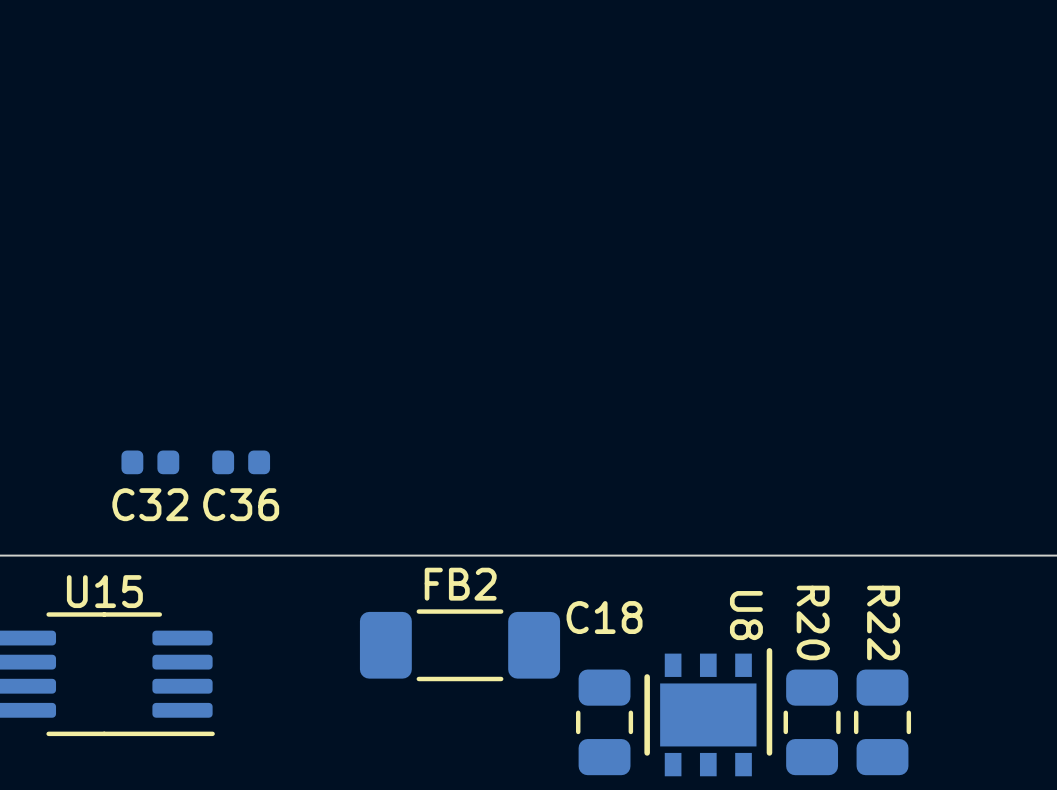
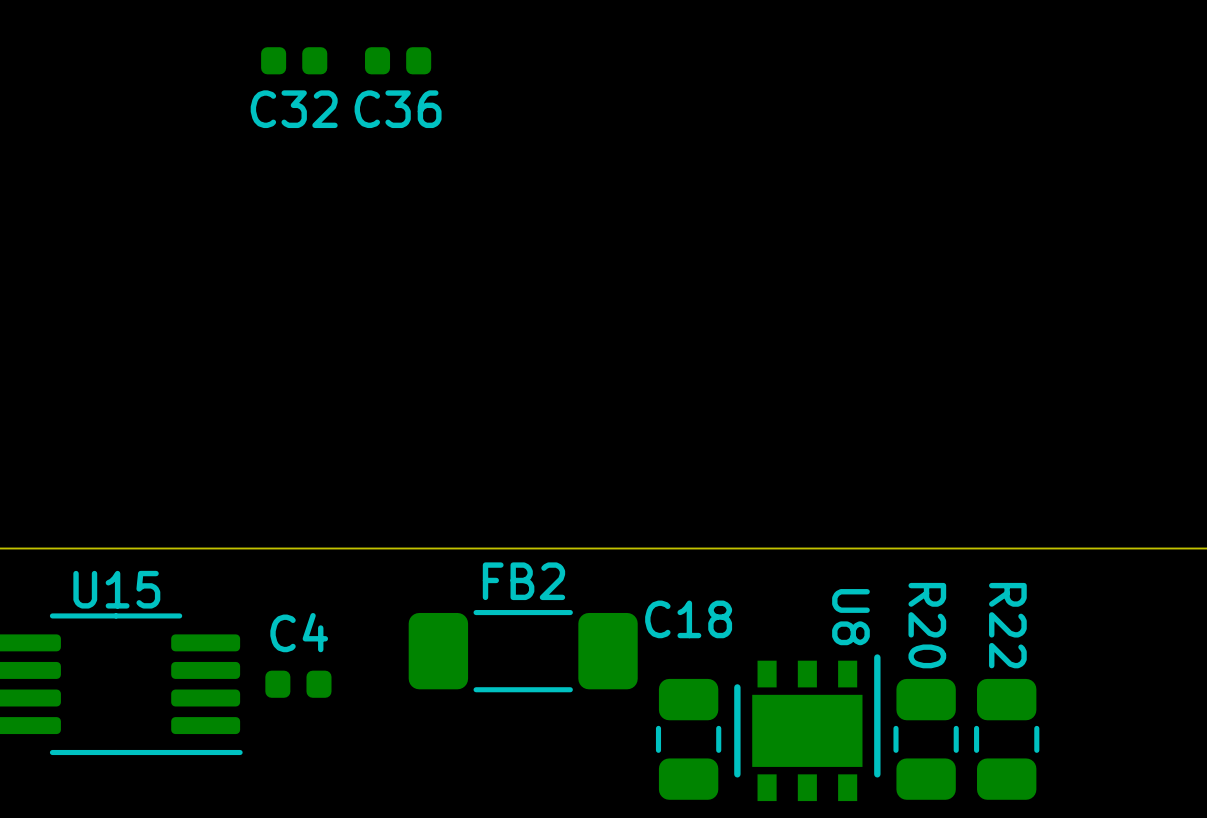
C32 position: (150, 462) -> (294, 60)
C36 position: (241, 462) -> (398, 60)
C4: none -> (298, 684)

